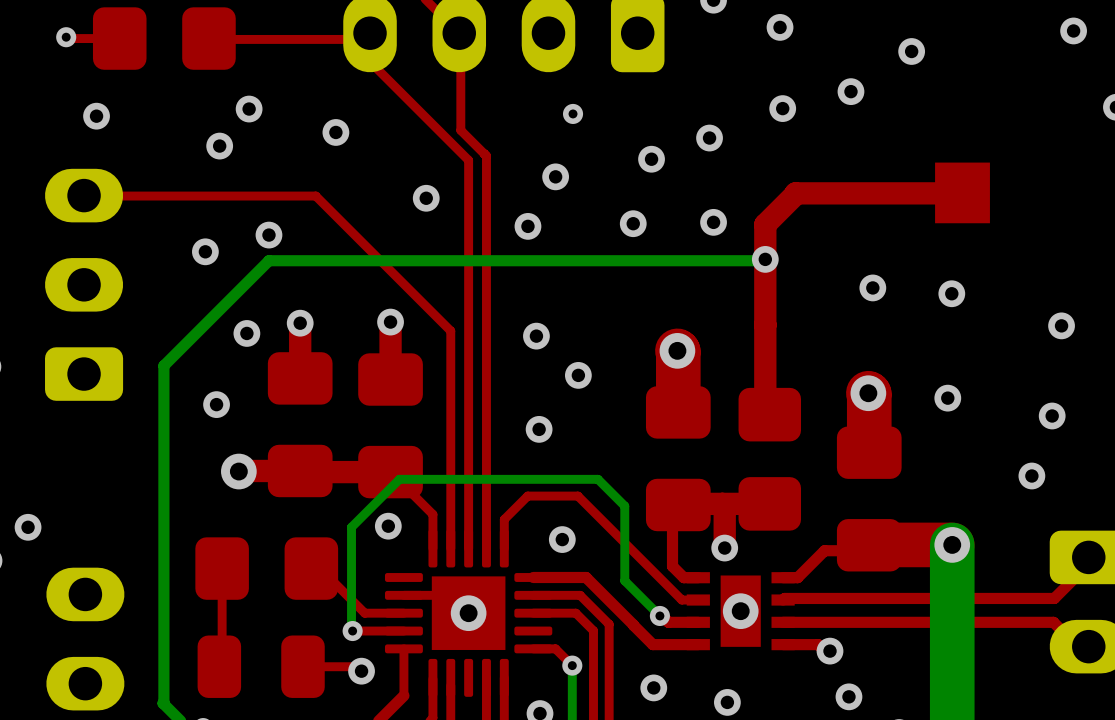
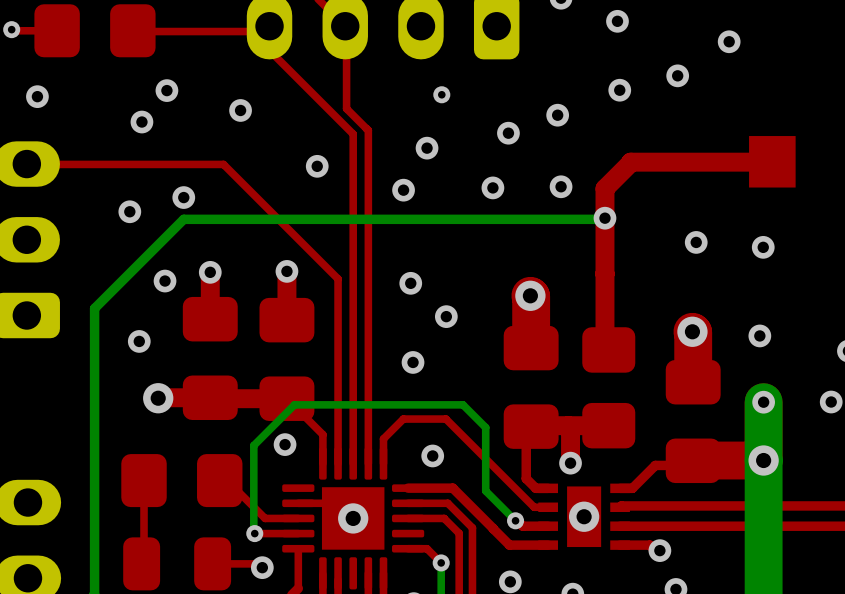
bottom track: none -> (763, 402) (763, 460)
via: none -> (763, 402)

